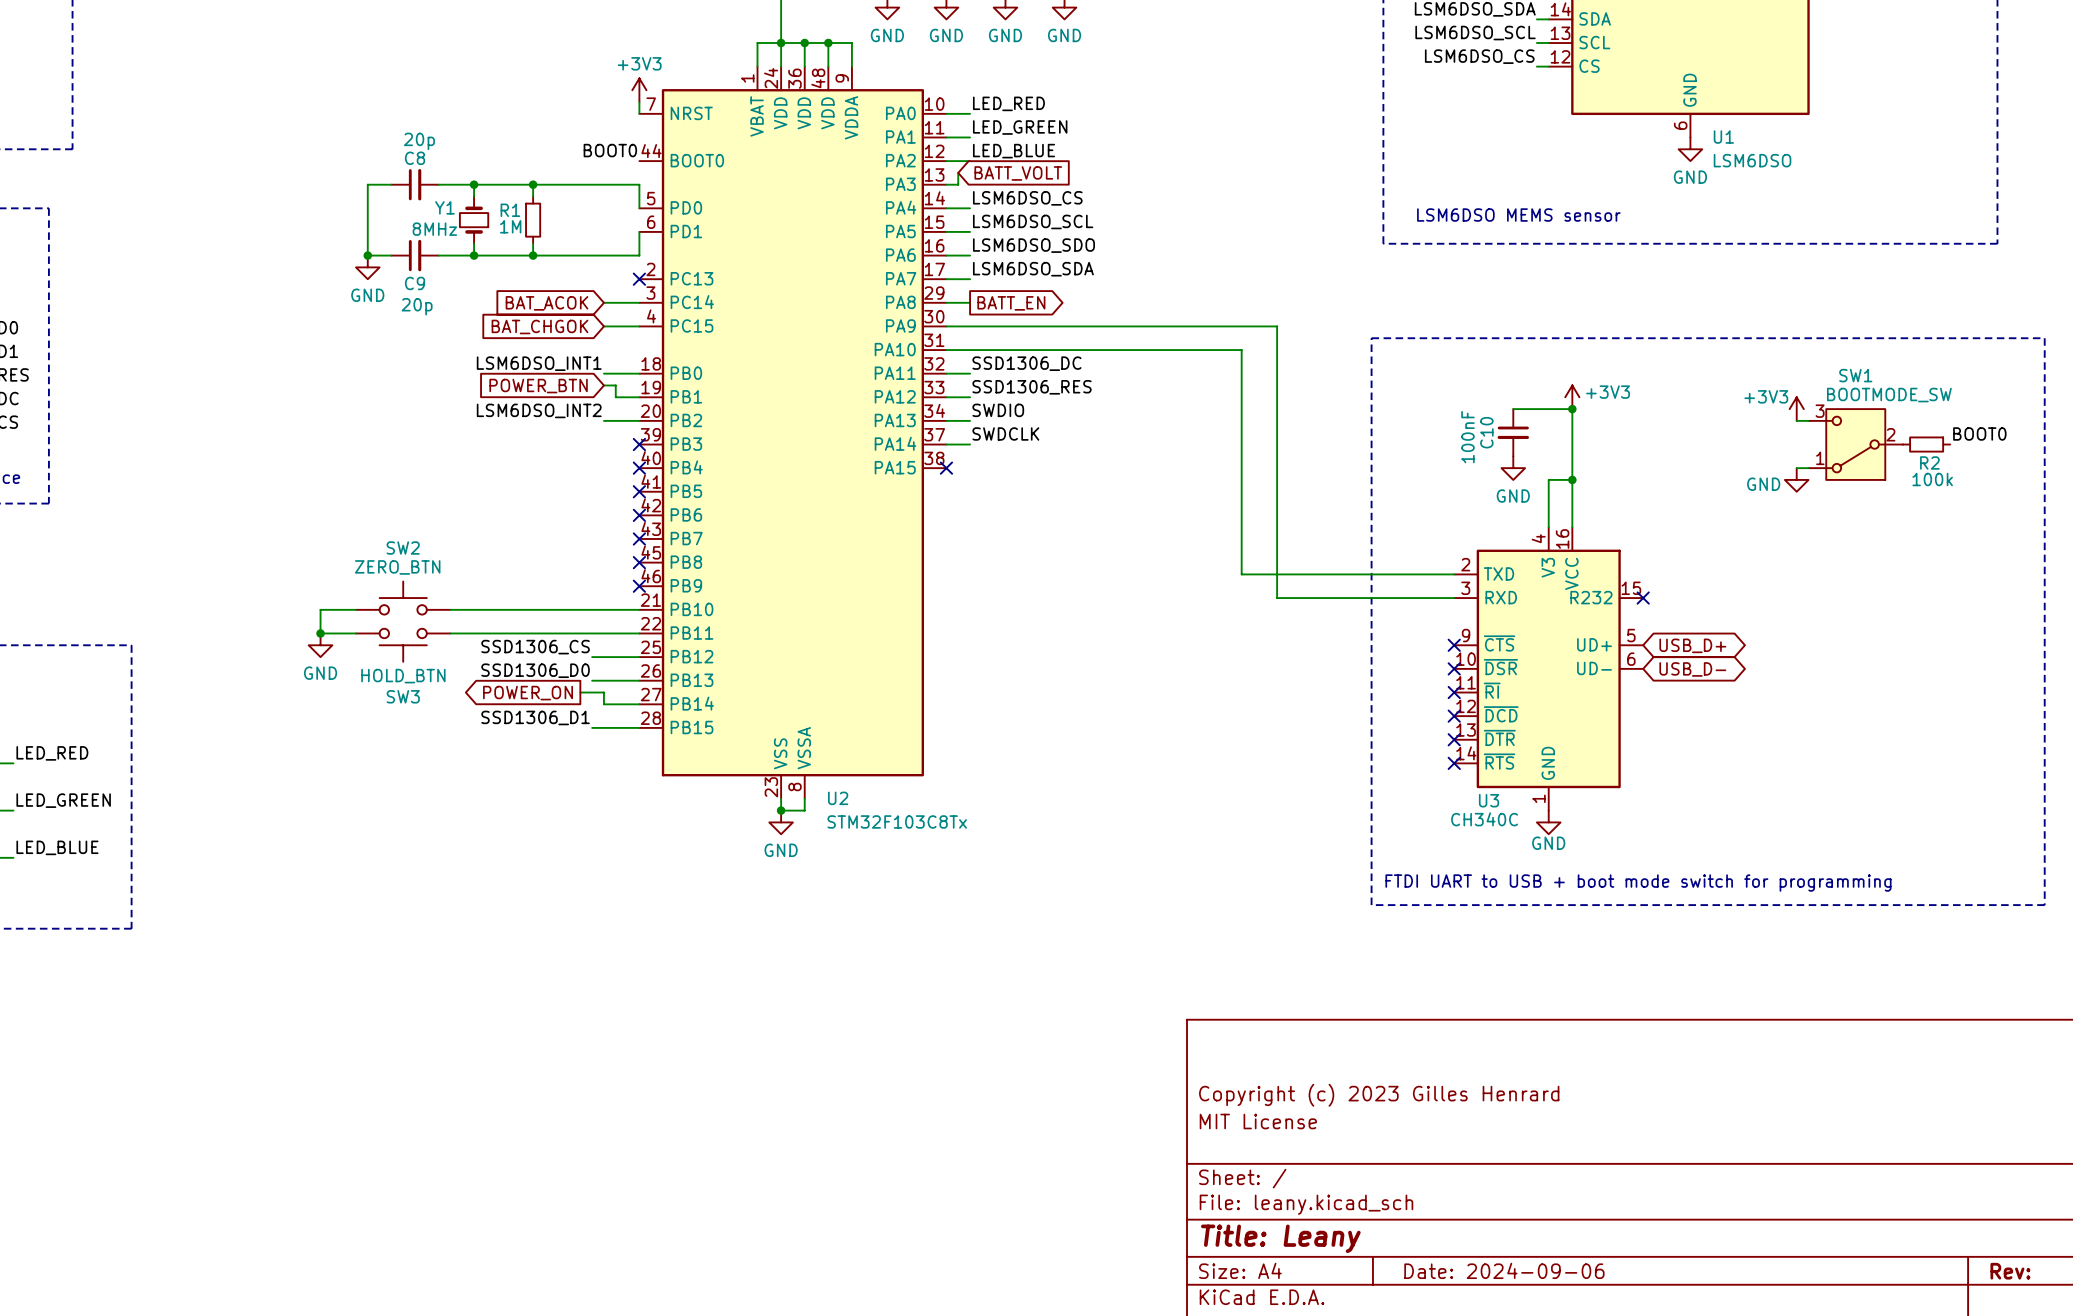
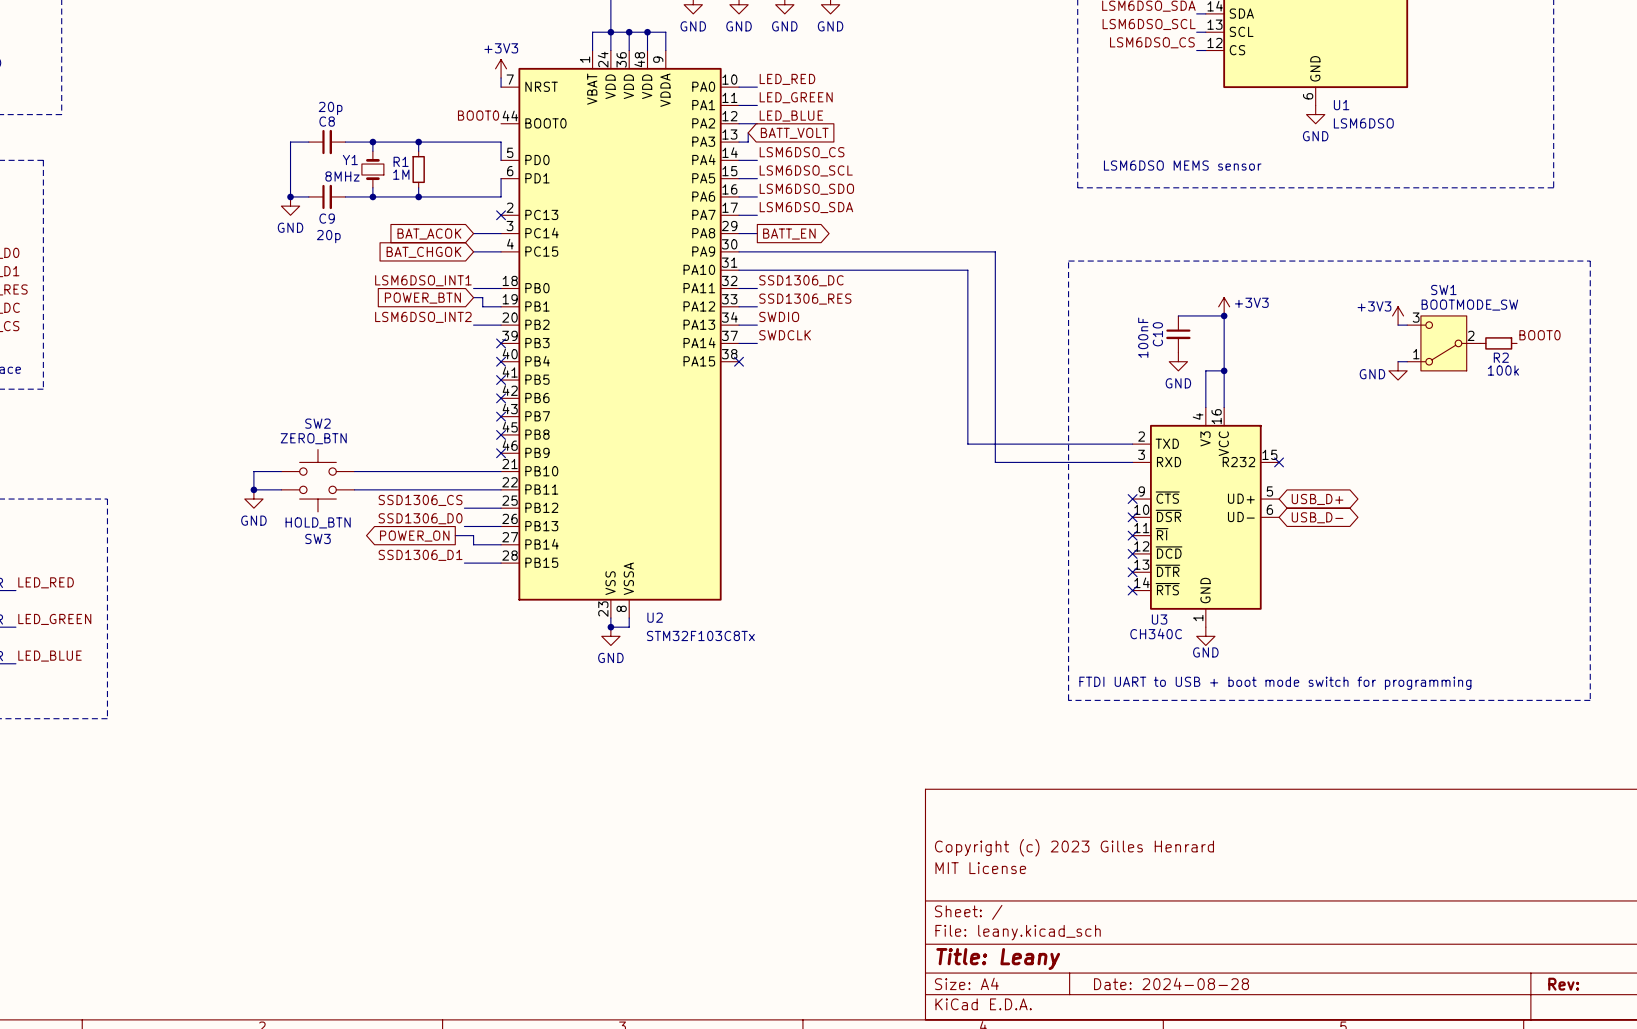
title block: Date: 2024-09-06 (1504, 1270) -> Date: 2024-08-28 (1171, 983)

